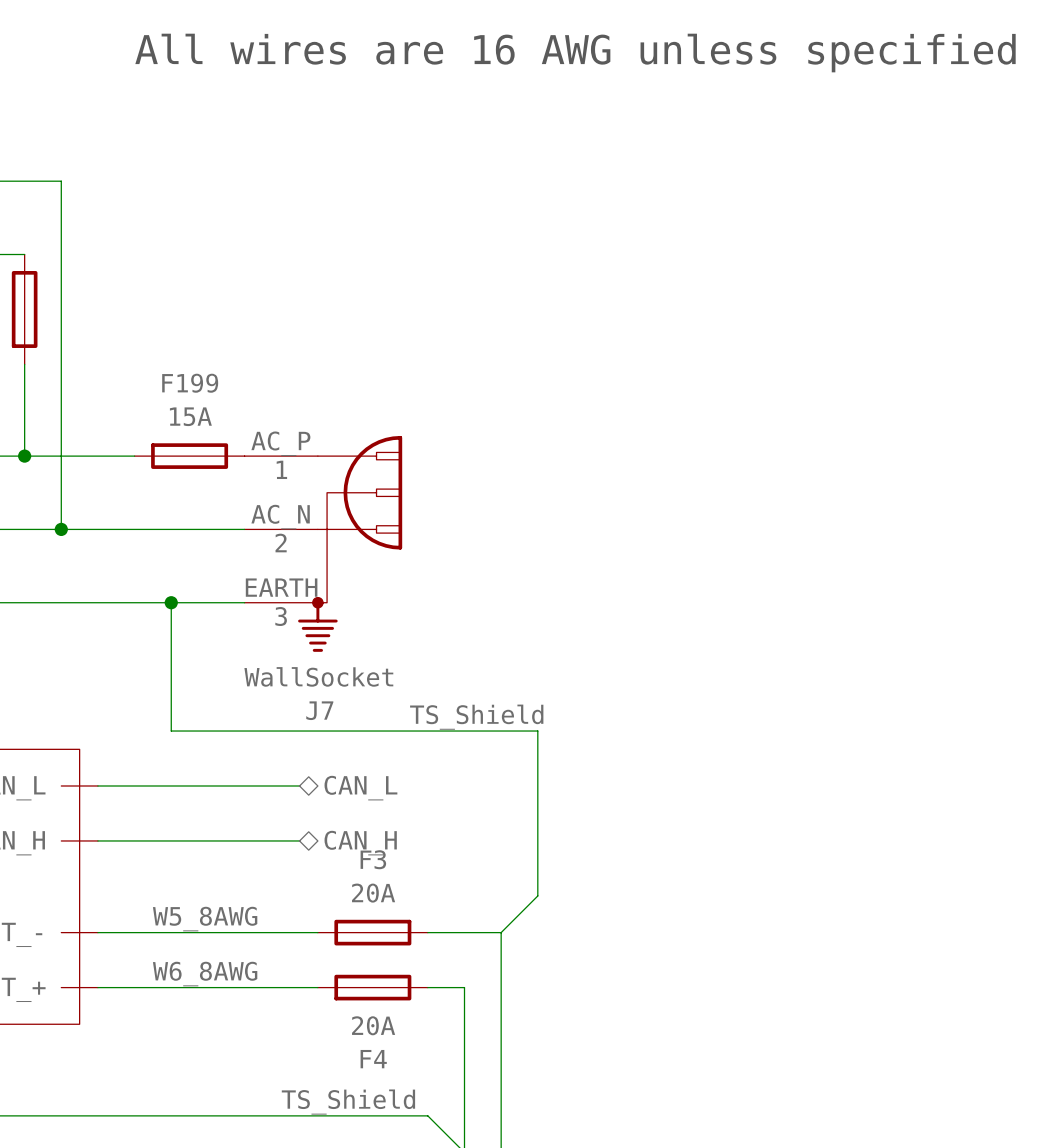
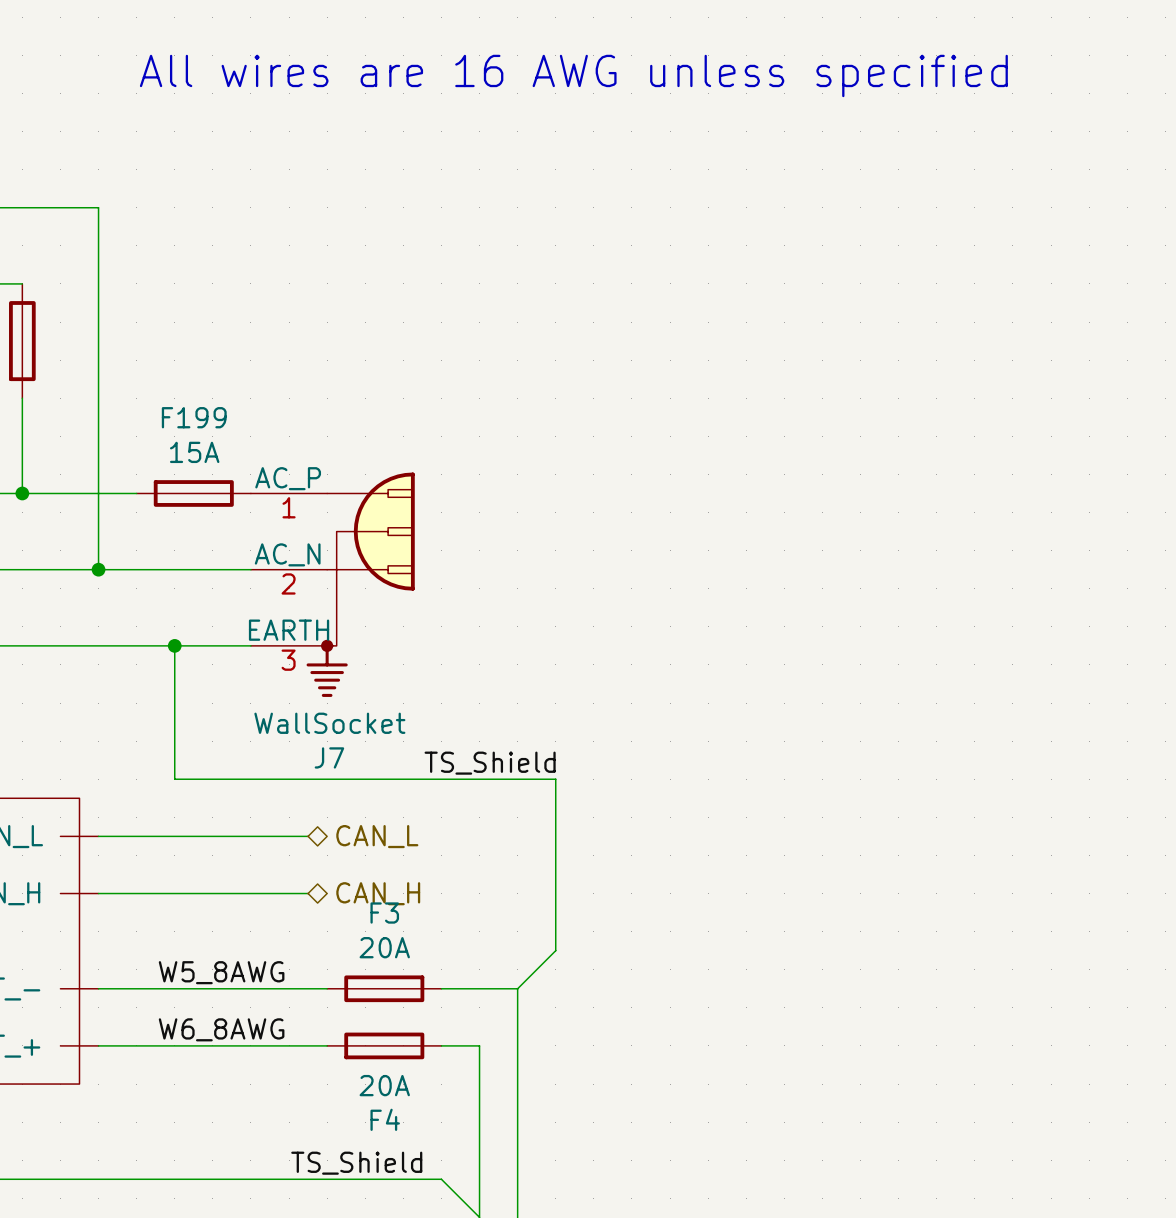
wire: (61, 181) (61, 529) -> (60, 207) (98, 207) (98, 569)
junction position: (61, 529) -> (98, 569)

